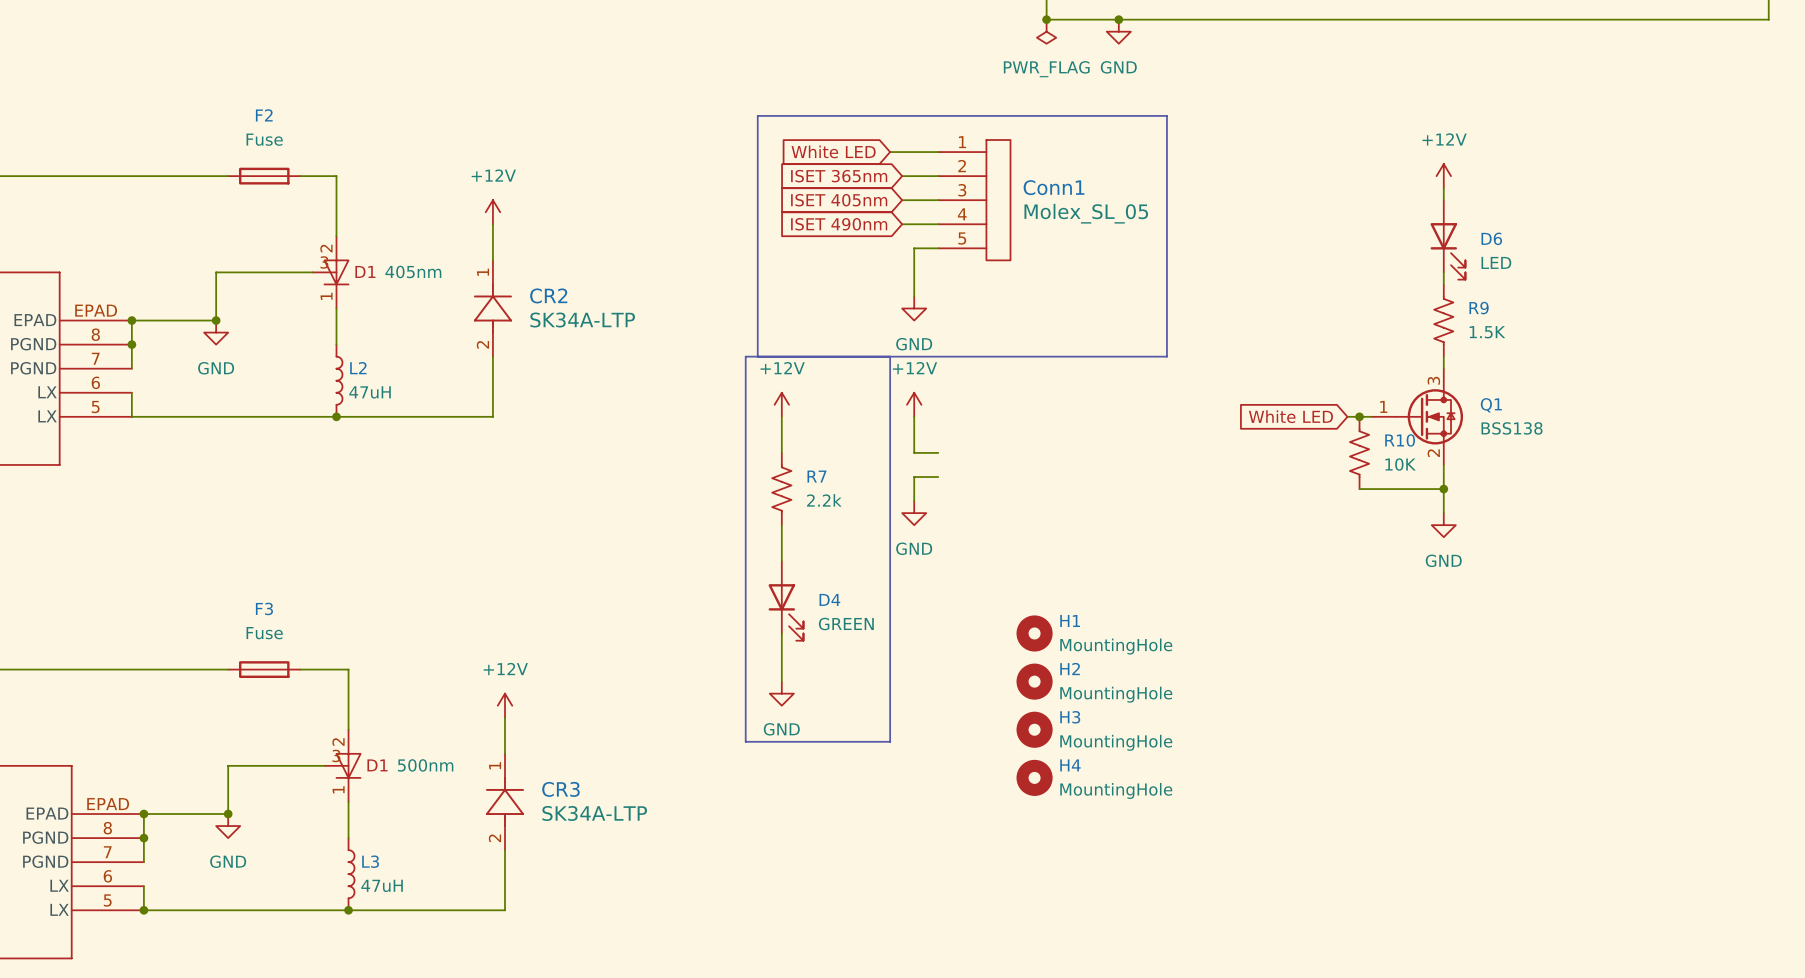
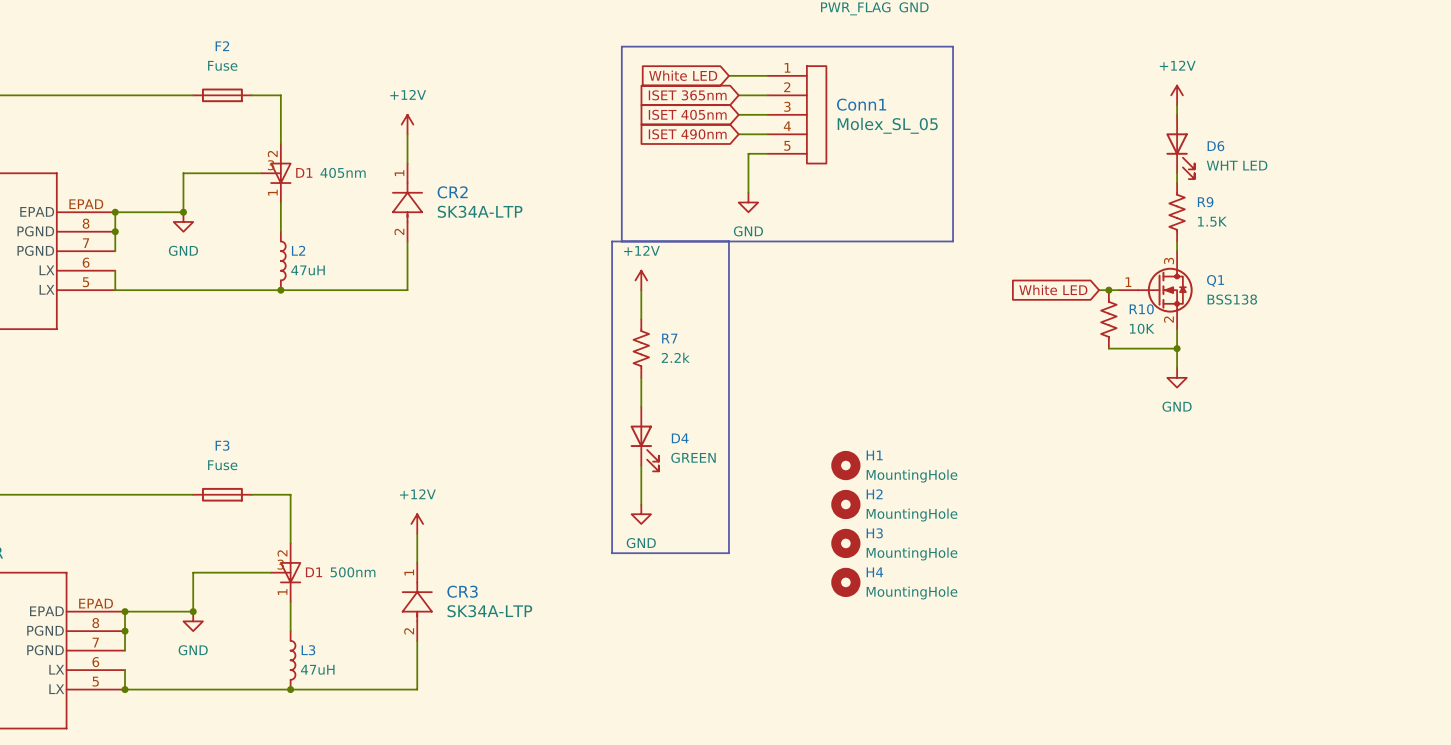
D6 value: LED (1496, 262) -> WHT LED (1237, 165)
power symbol: +12V (914, 404) -> none
wire: (914, 416) (914, 452) (938, 452) -> none
wire: (938, 477) (914, 477) (914, 501) -> none
power symbol: GND (914, 513) -> none

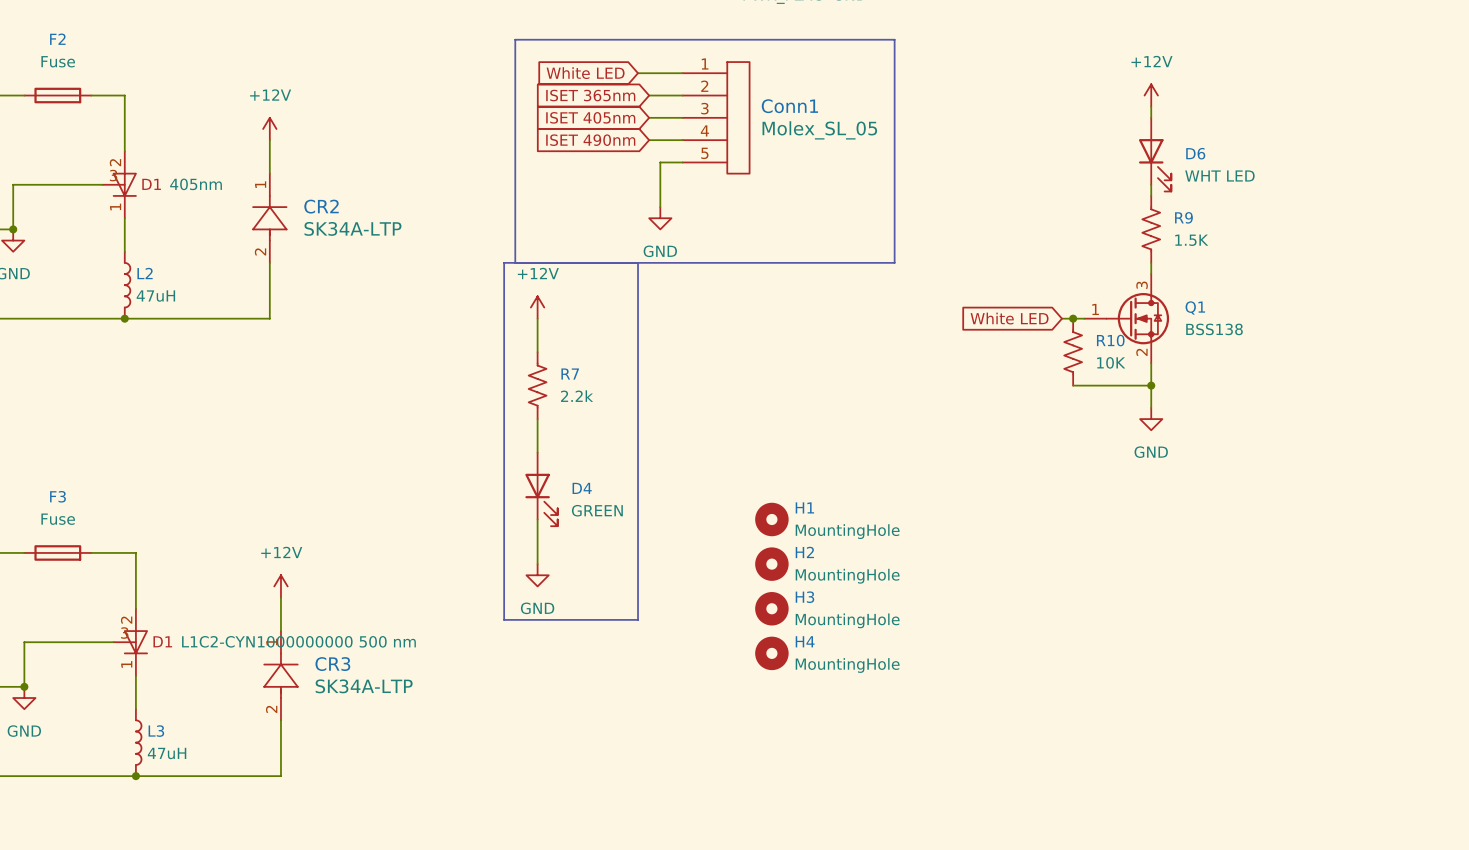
part value: 500nm (353, 572) -> L1C2-CYN1000000000 500 nm (298, 641)

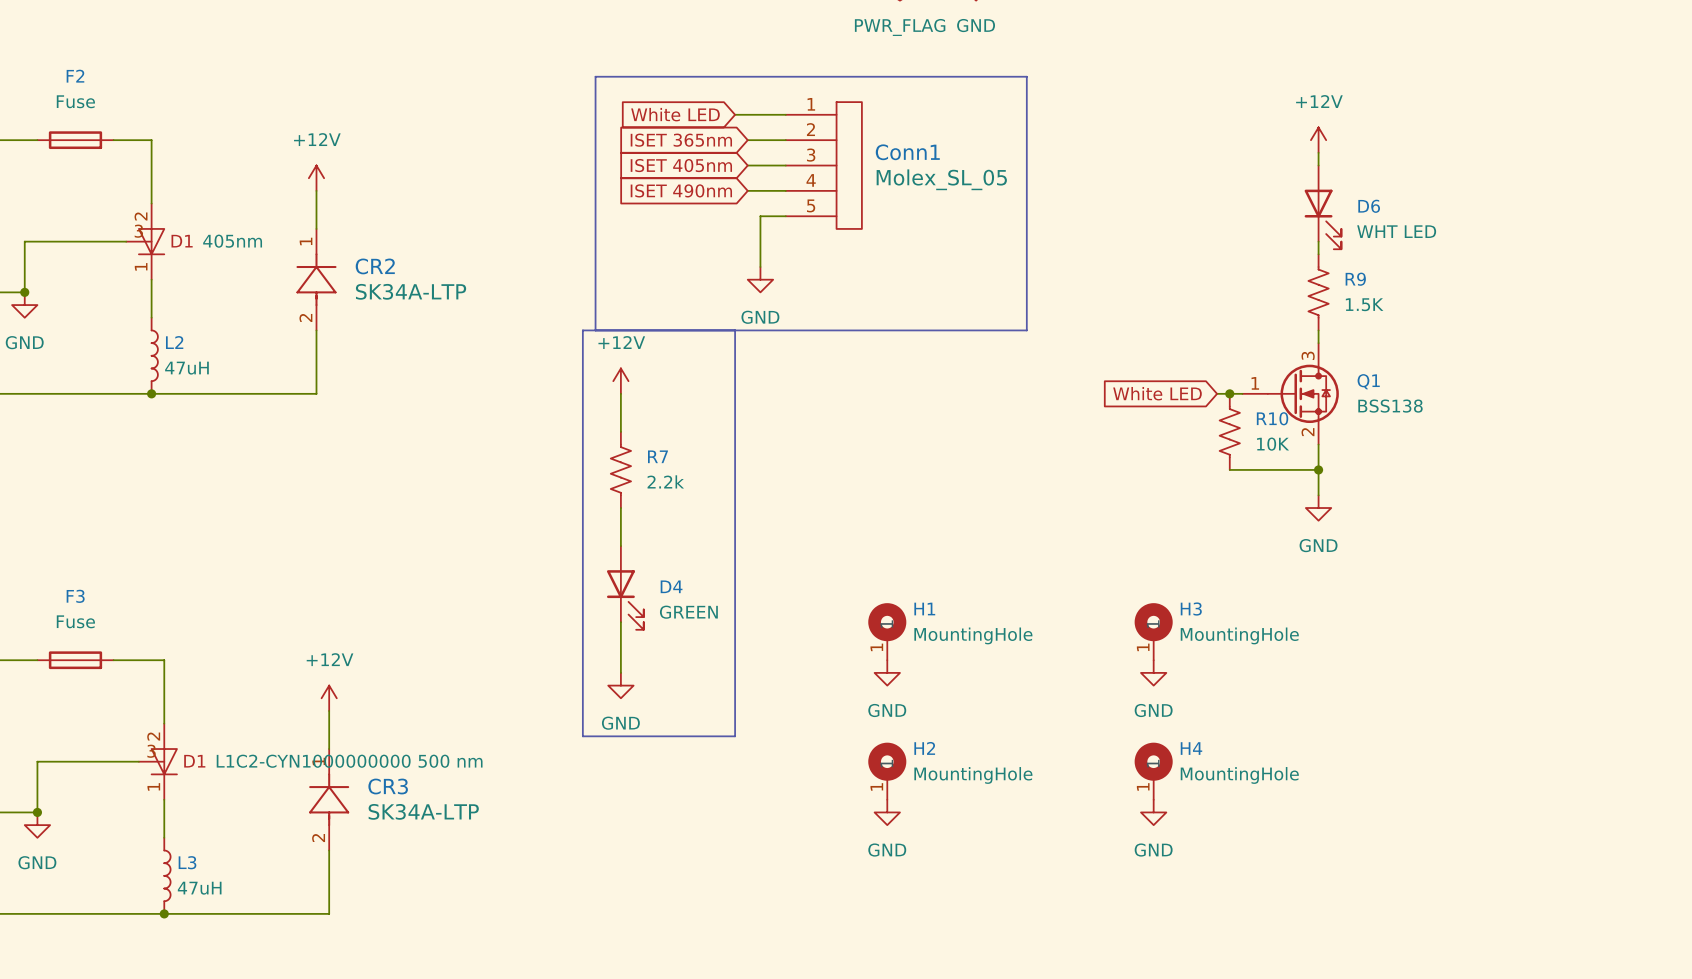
H1 symbol: [755, 502, 789, 537] -> [868, 603, 907, 661]
H2 symbol: [755, 547, 789, 581] -> [868, 742, 907, 800]
power symbol: none -> GND (887, 672)
power symbol: none -> GND (1153, 672)
H3 symbol: [755, 592, 789, 626] -> [1134, 603, 1173, 661]
H4 symbol: [755, 636, 789, 671] -> [1134, 742, 1173, 800]
power symbol: none -> GND (887, 812)
power symbol: none -> GND (1153, 812)

